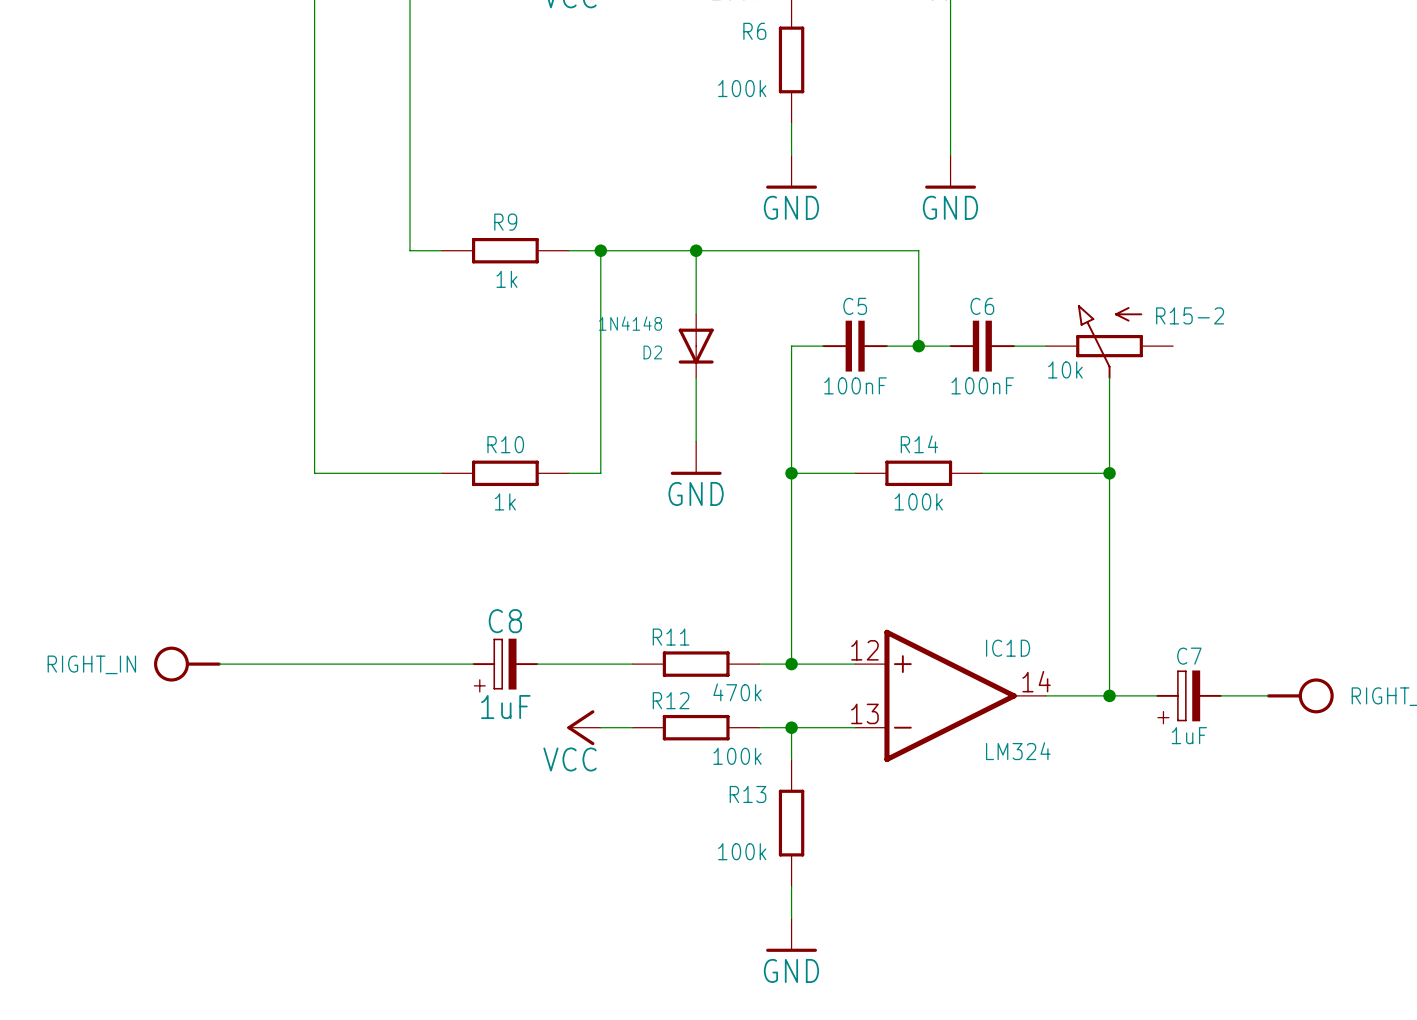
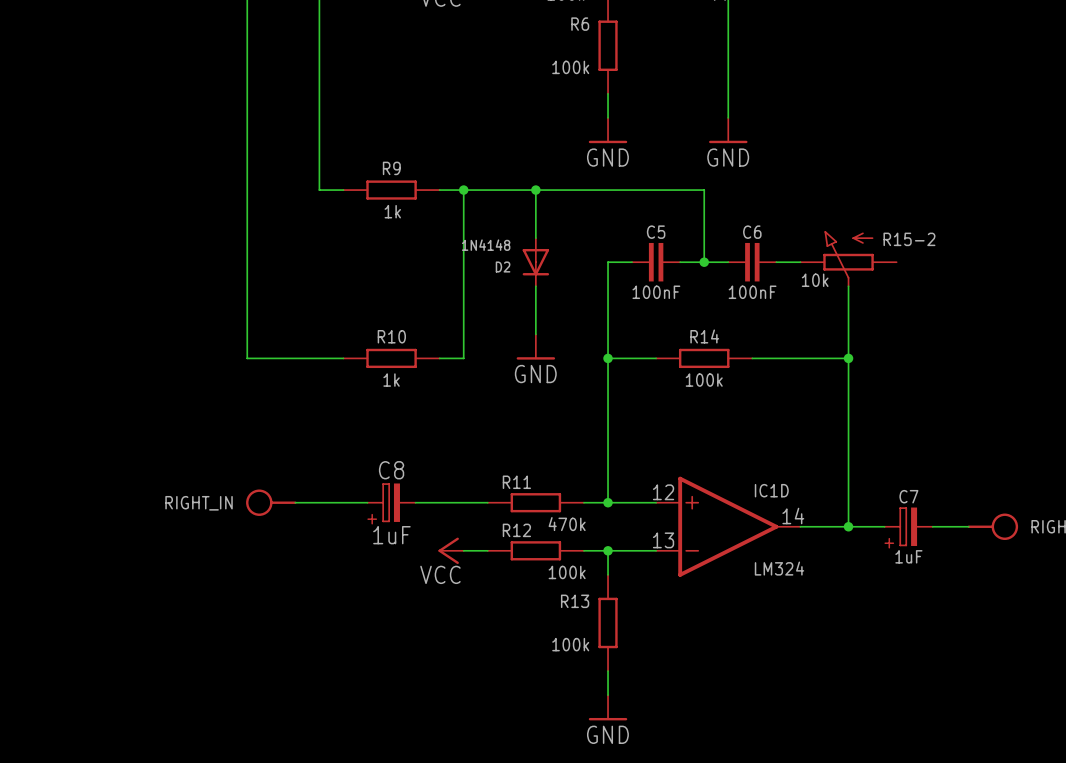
RIGHT_IN position: (187, 664) -> (271, 502)
wire: (219, 664) (378, 664) -> none

